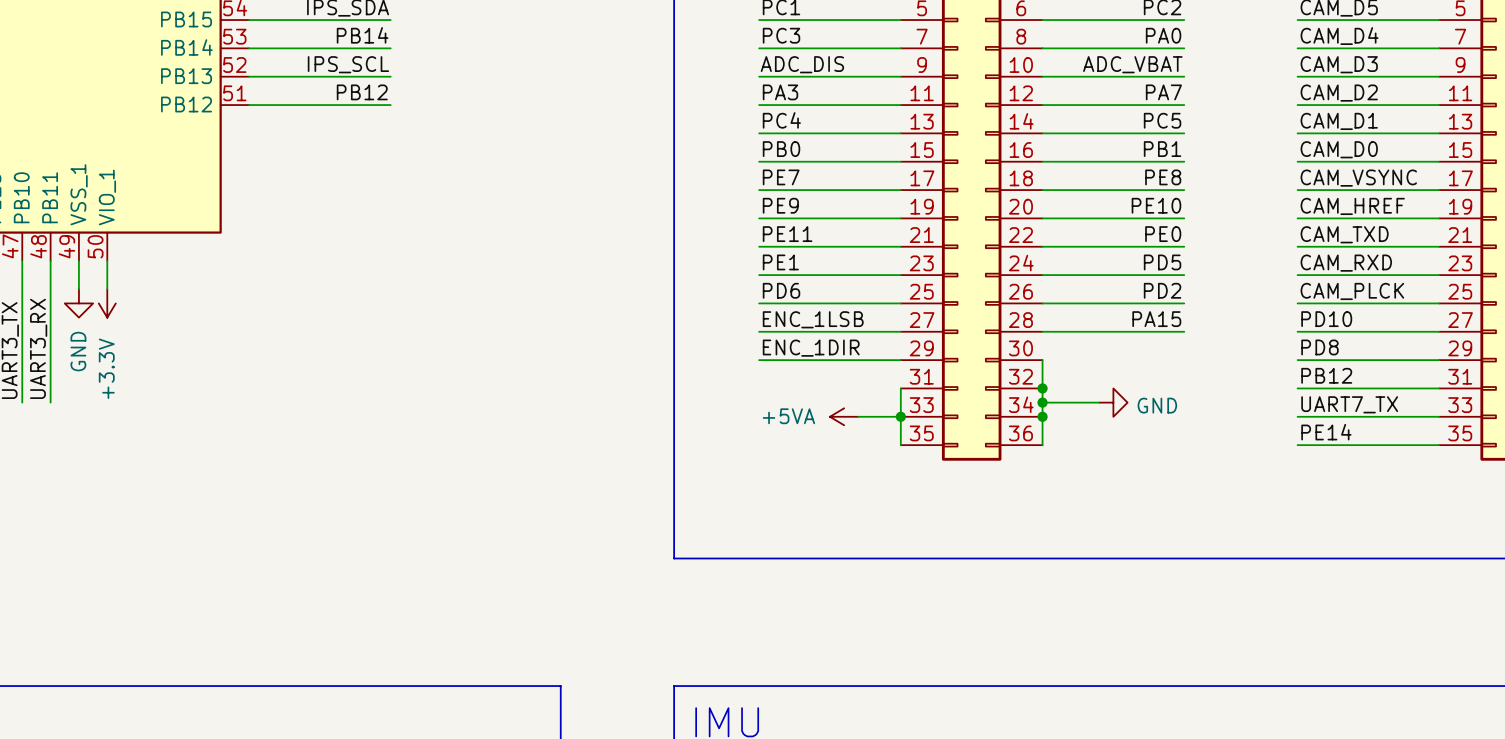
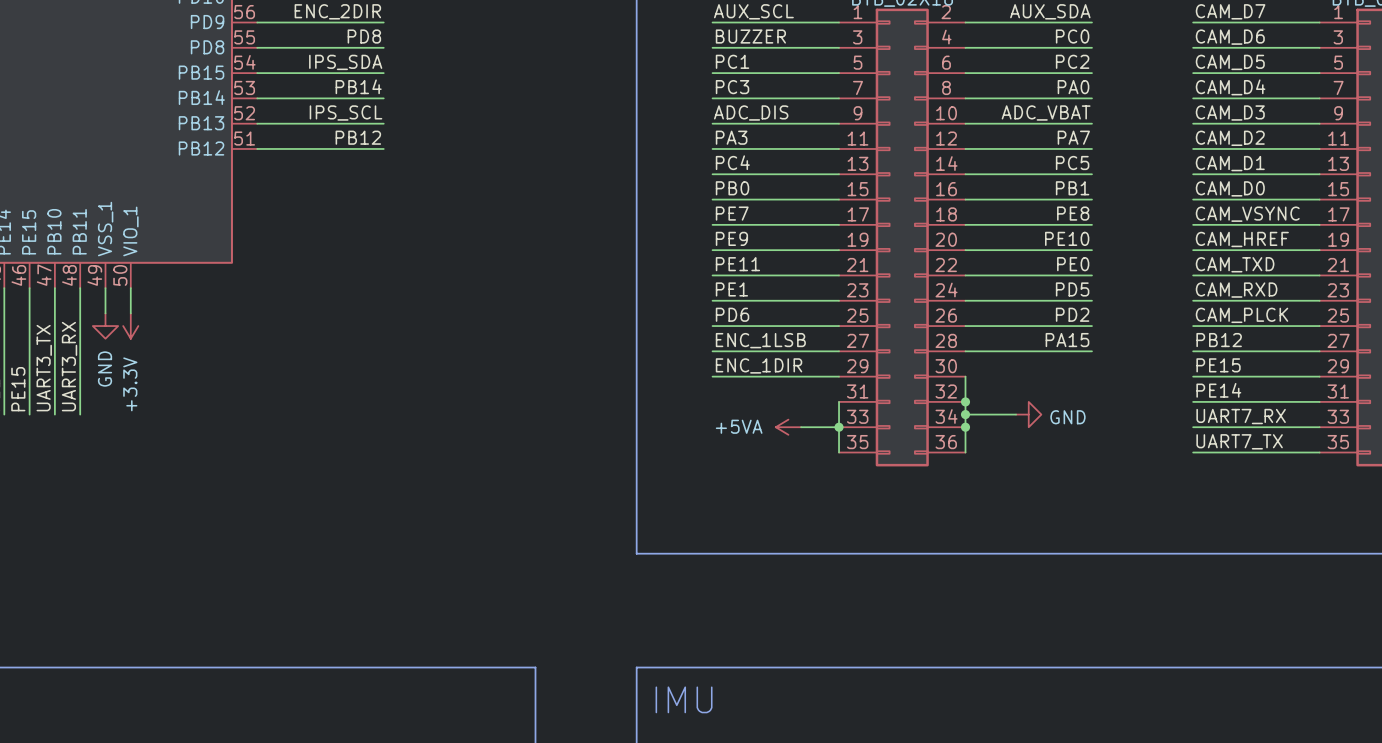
label: PD10 (1326, 319) -> PB12 (1219, 340)
label: PD8 (1319, 347) -> PE15 (1218, 365)
label: PB12 (1326, 375) -> PE14 (1218, 390)
label: UART7_TX (1349, 404) -> UART7_RX (1241, 416)
label: PE14 (1326, 432) -> UART7_TX (1239, 441)

